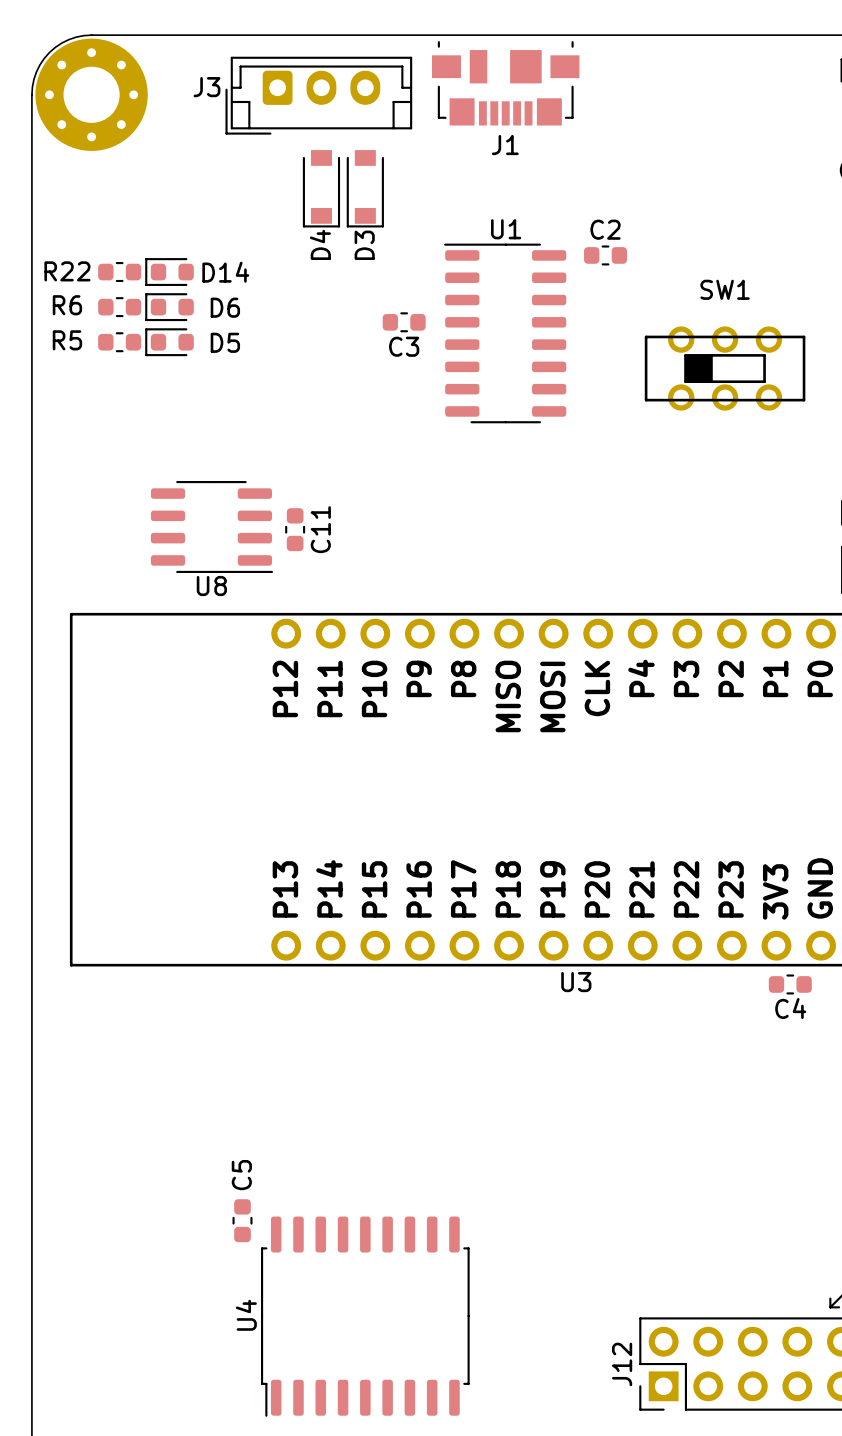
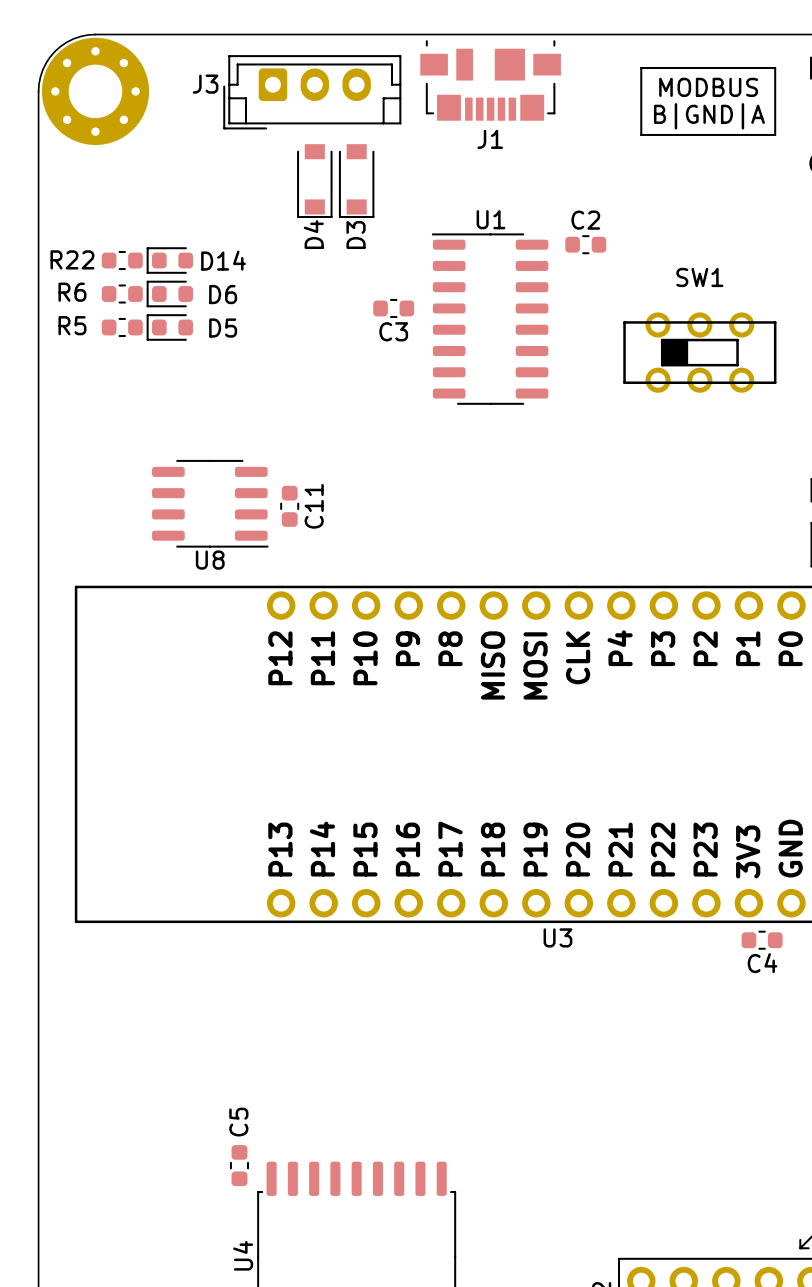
line: none -> (641, 67) (641, 134) (775, 134) (775, 67) (641, 67)
text: none -> MODBUS (708, 87)
text: none -> B|GND|A (709, 116)

